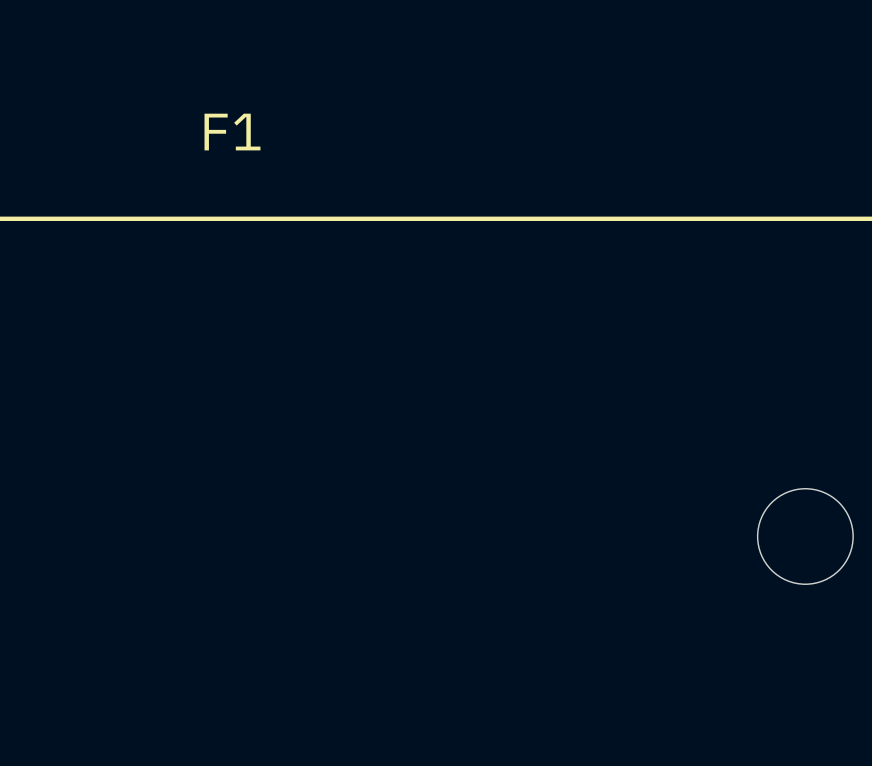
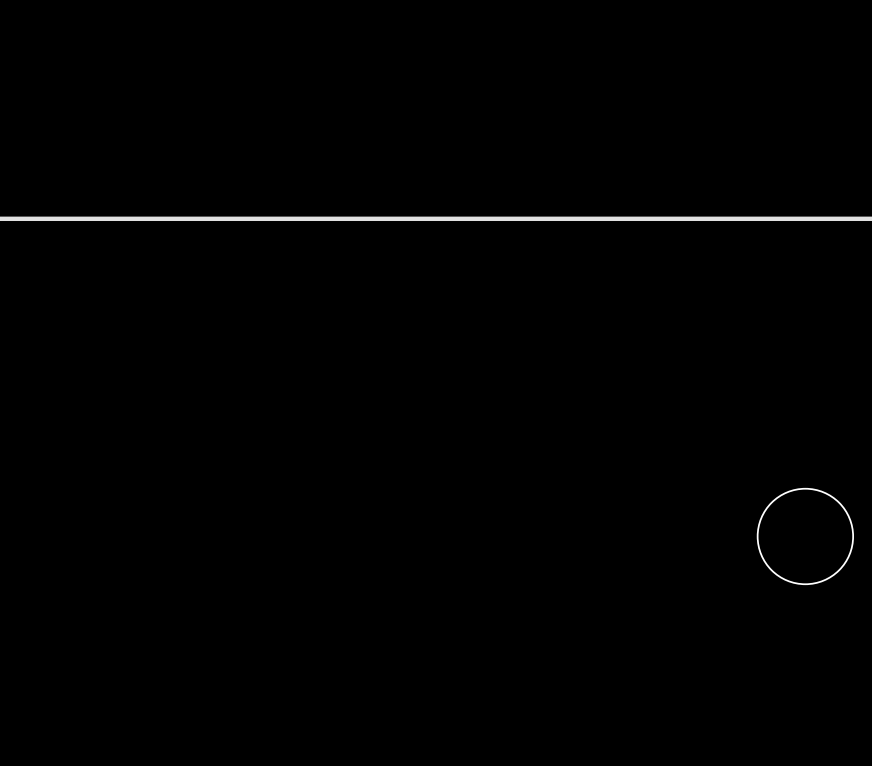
text: F1 (232, 132) -> none

